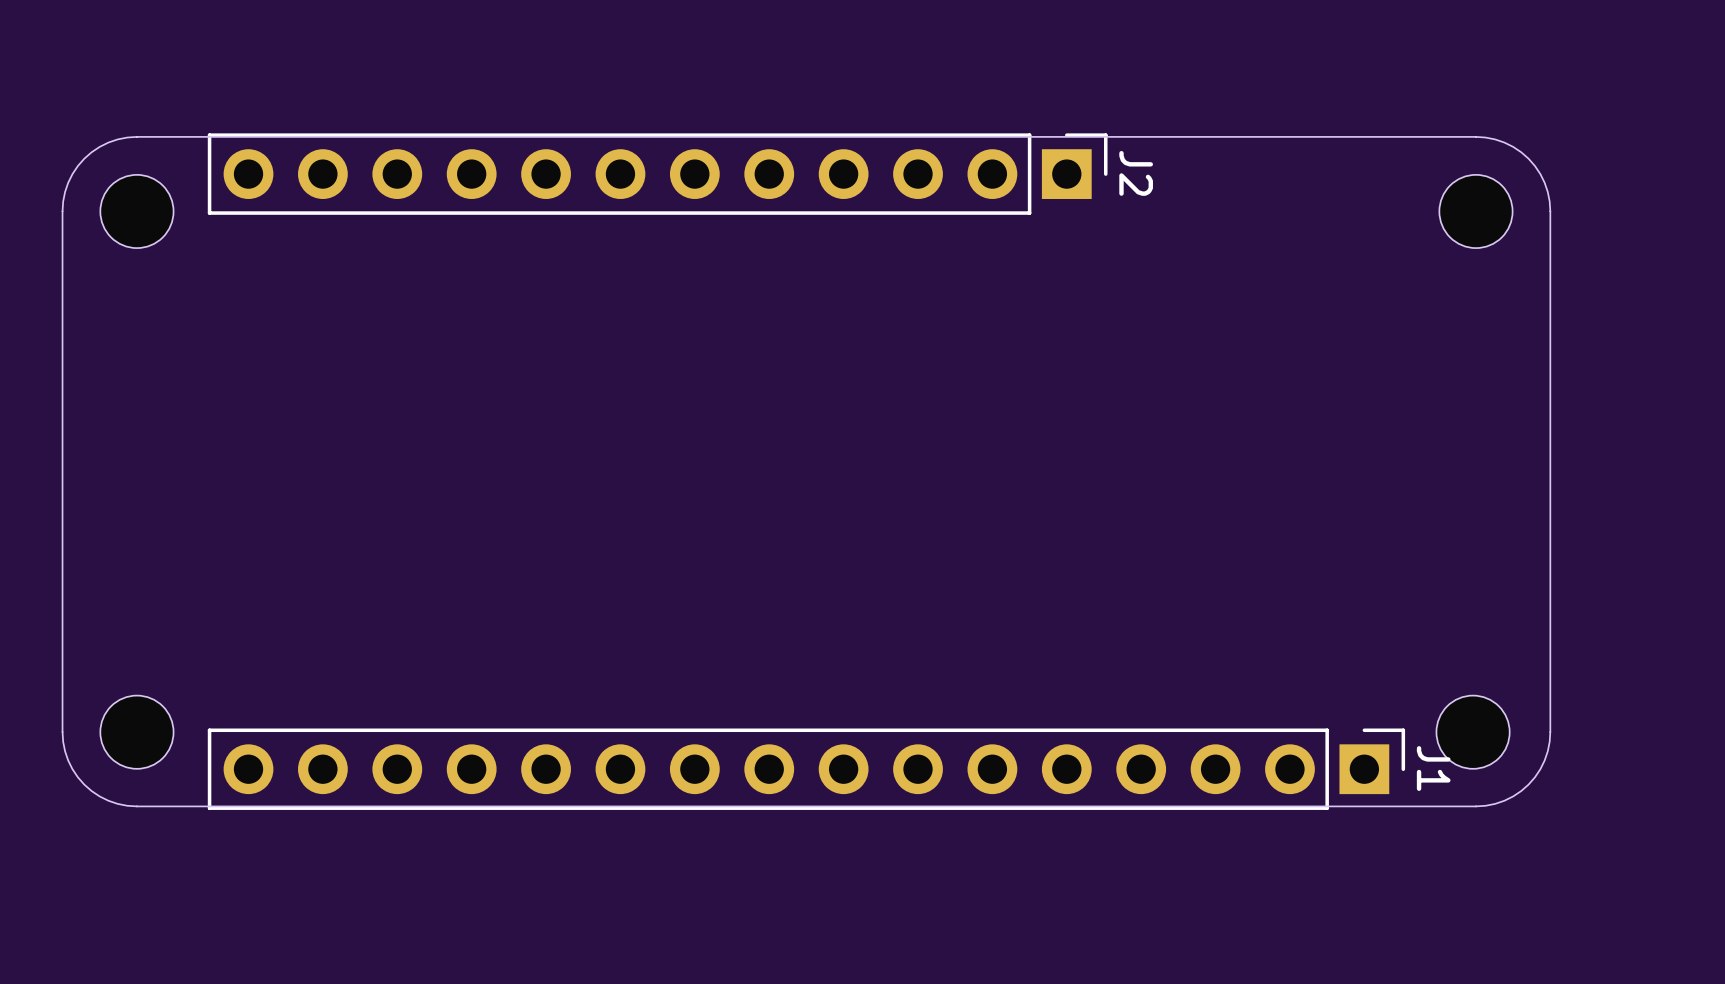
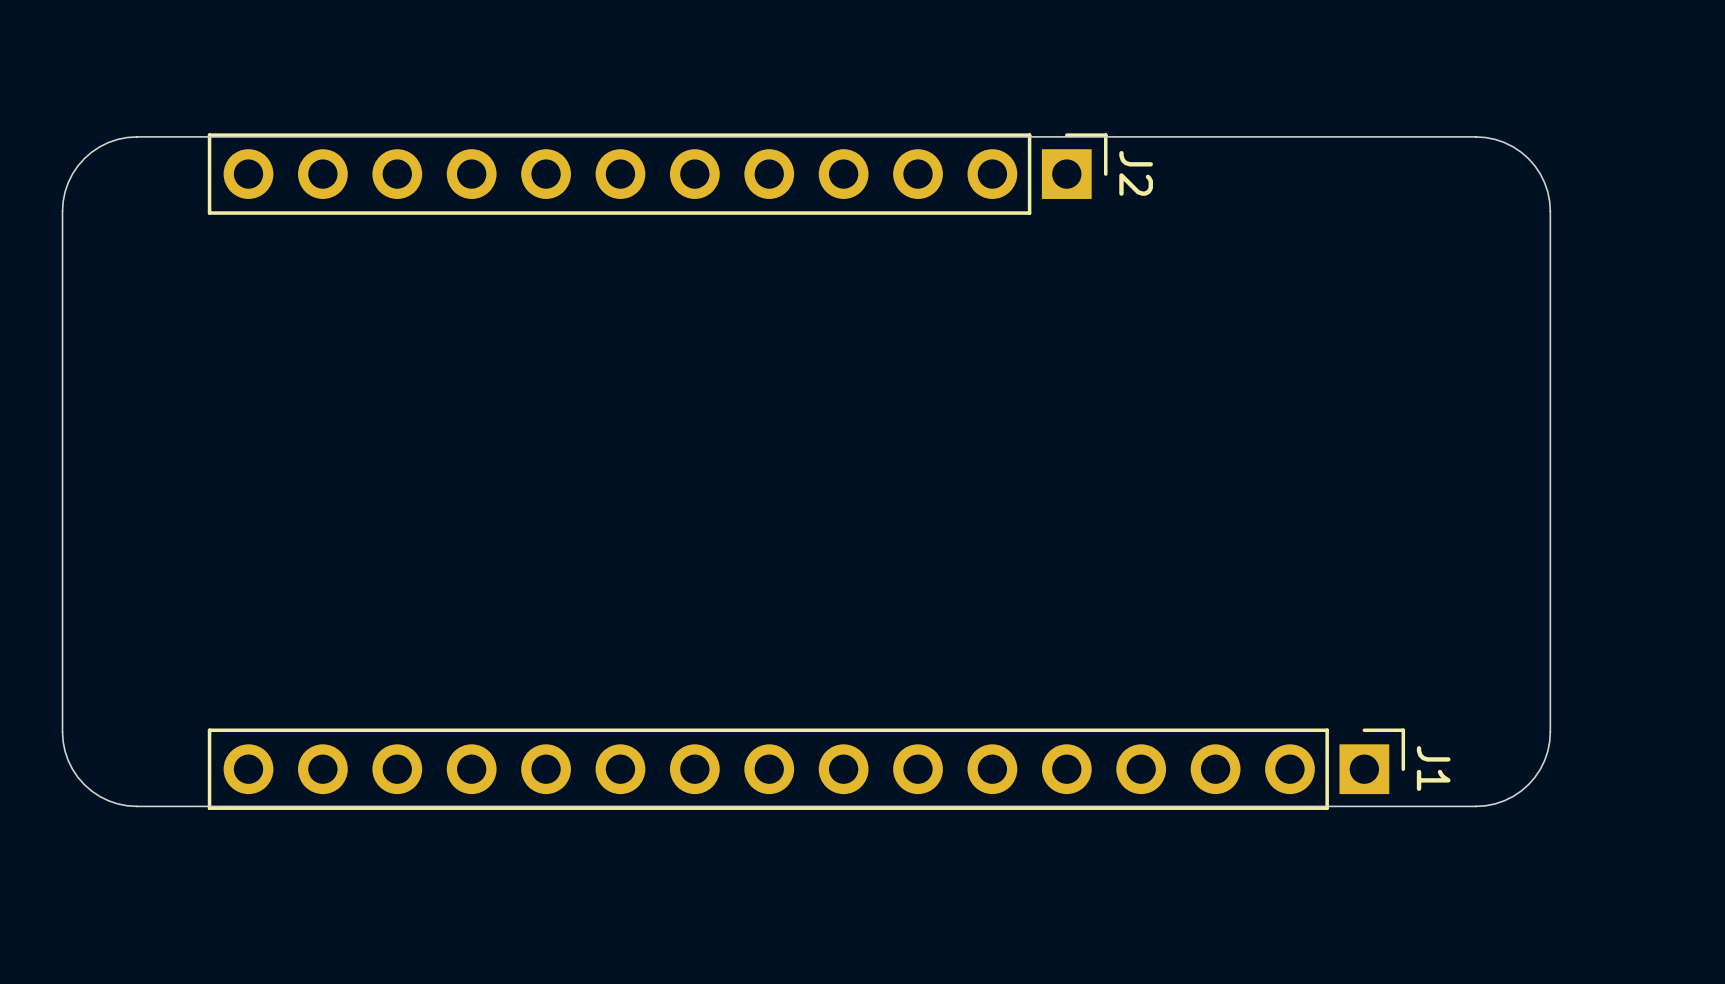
part: (136, 211) -> none
part: (1475, 211) -> none
part: (136, 732) -> none
part: (1473, 732) -> none

